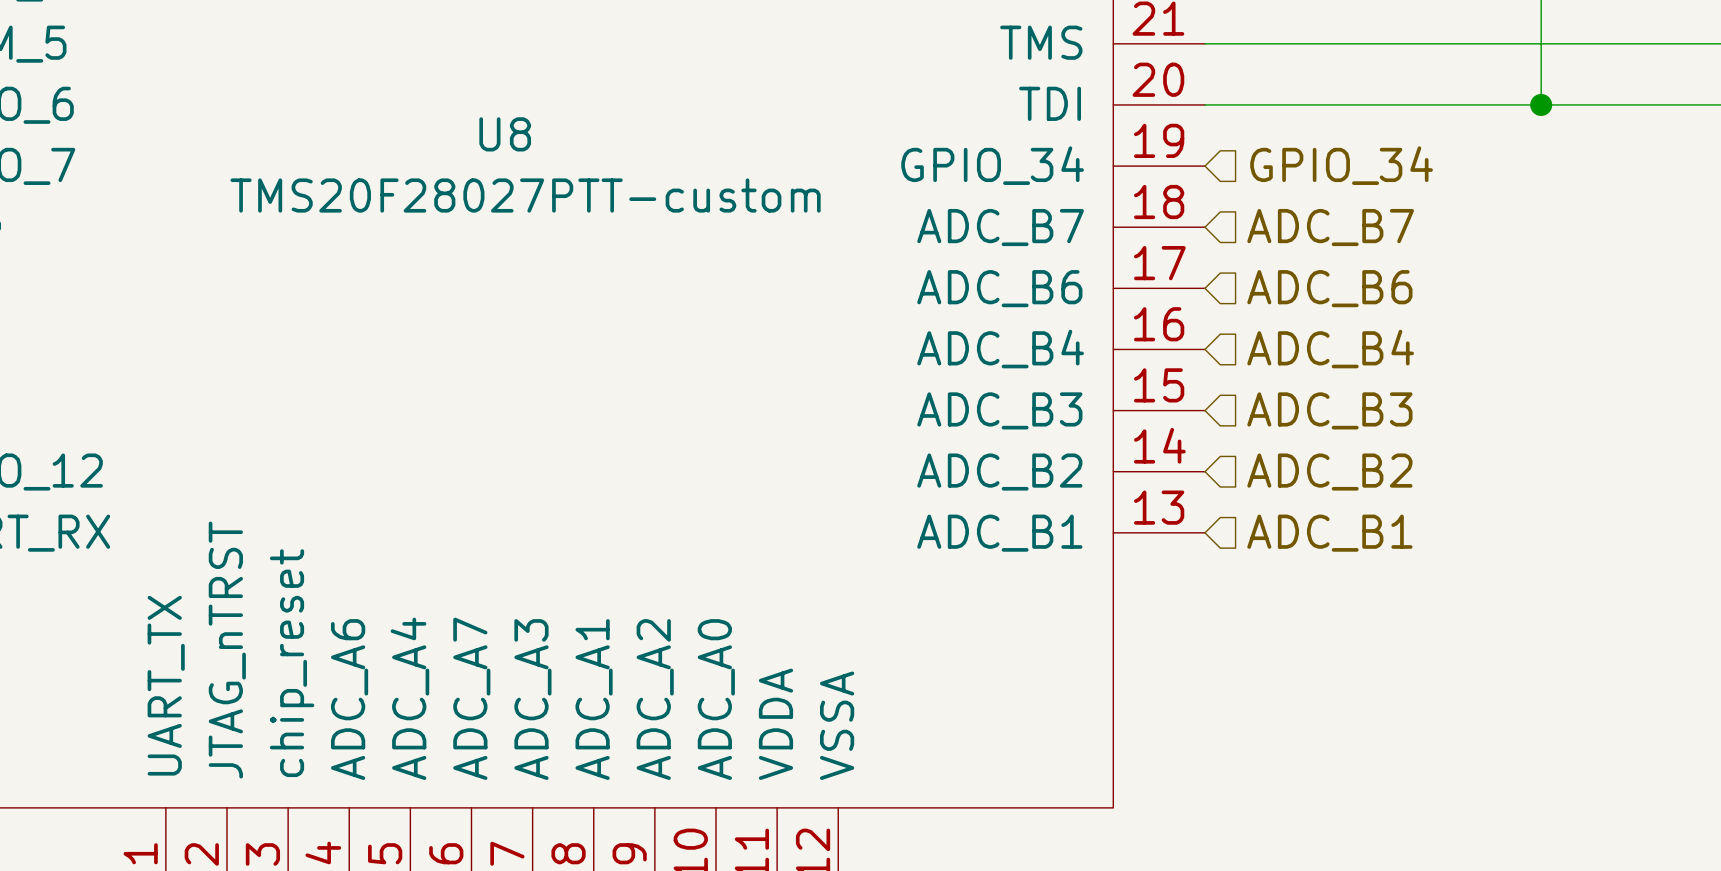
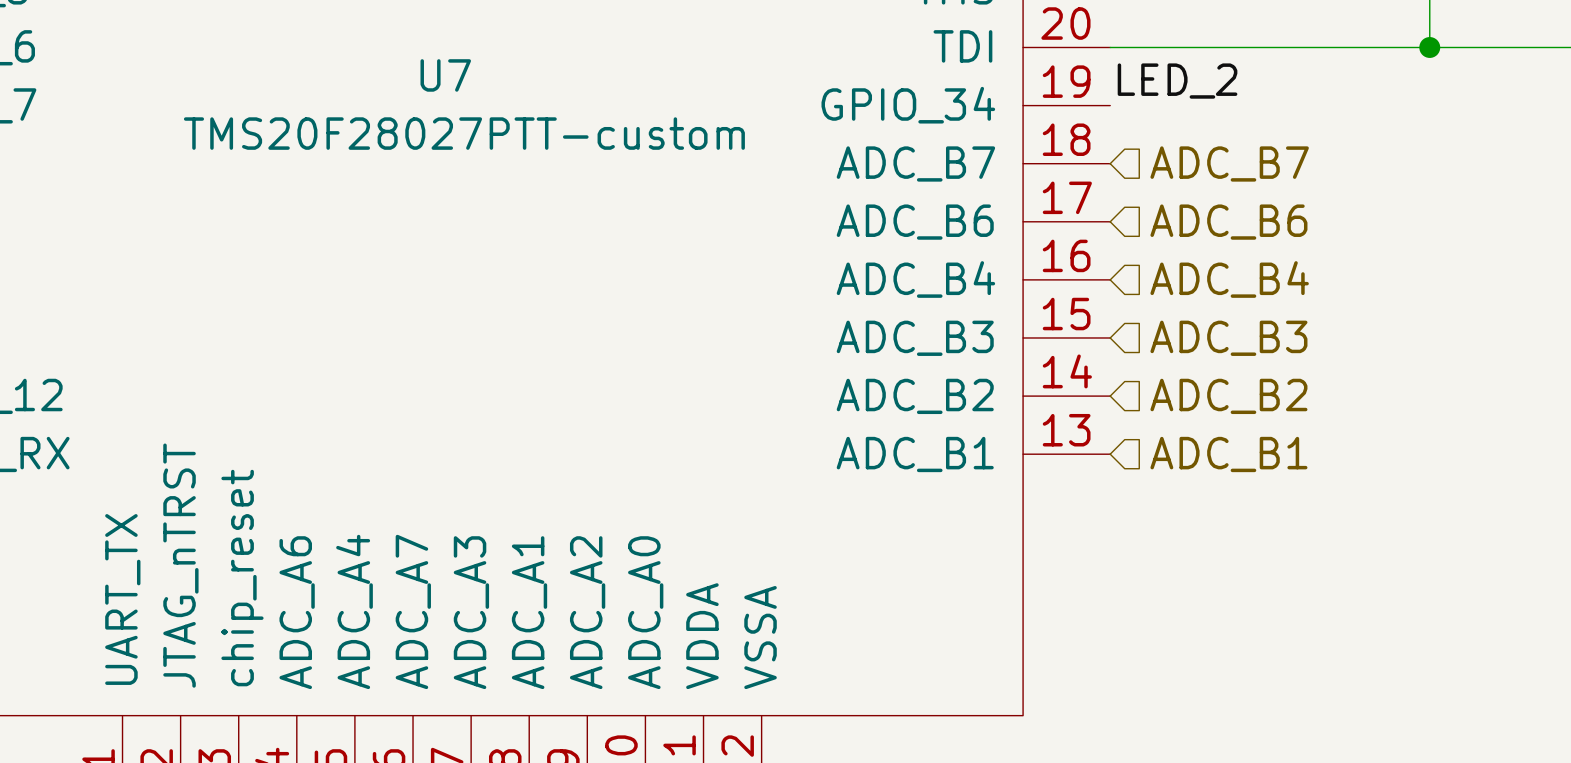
U8 name: U8 (505, 134) -> U7 (445, 75)
label: none -> LED_2 (1177, 81)
hierarchical label: GPIO_34 (1341, 165) -> none

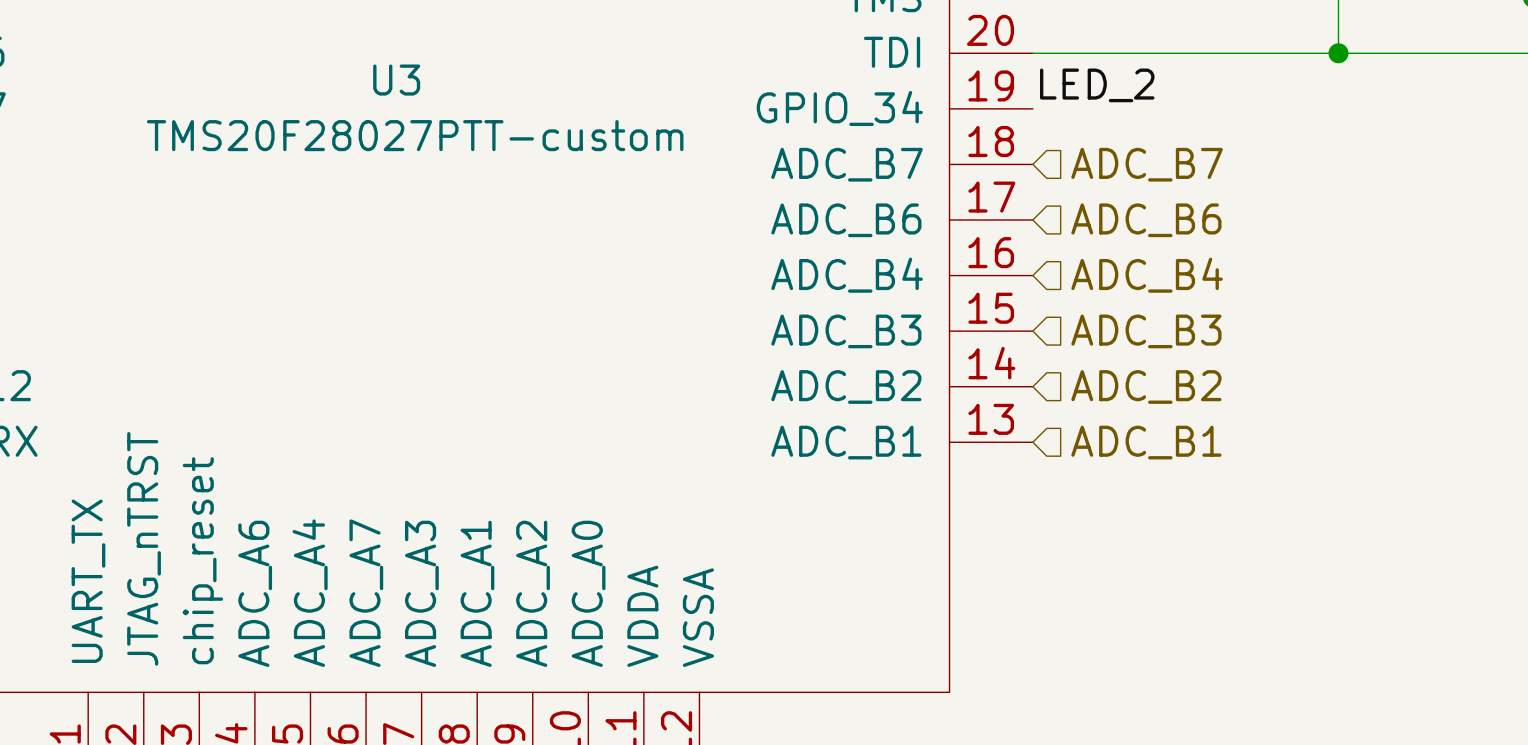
U7 name: U7 (445, 75) -> U3 (396, 80)

